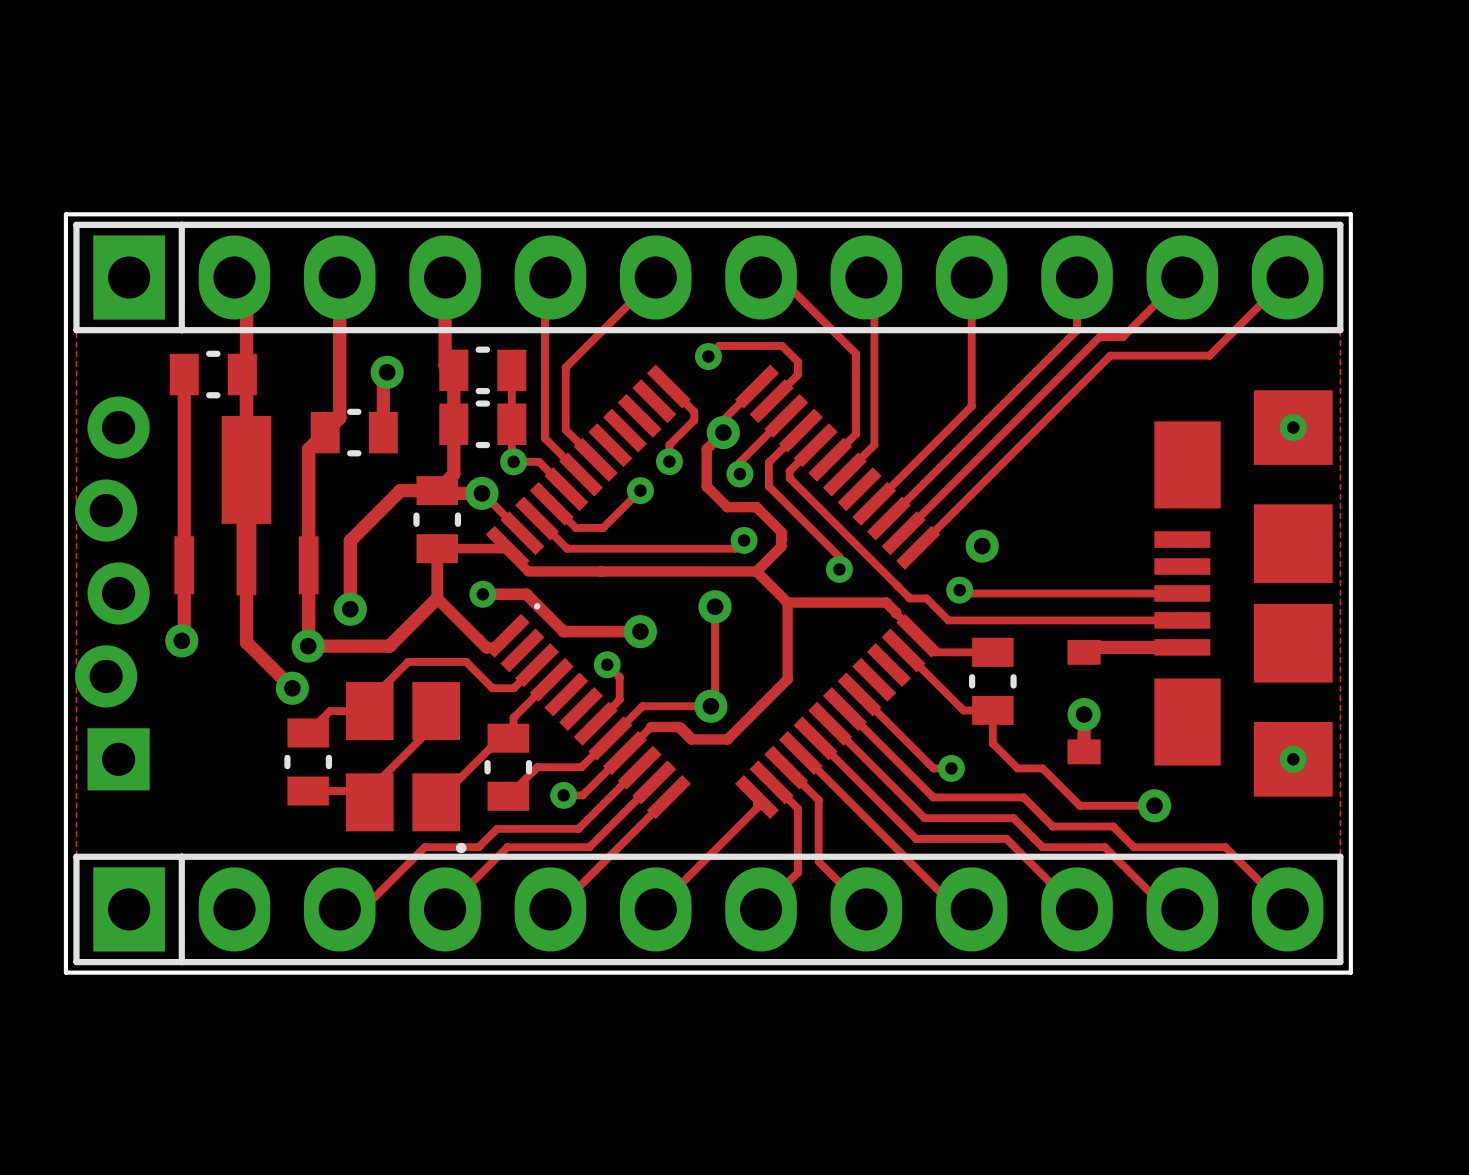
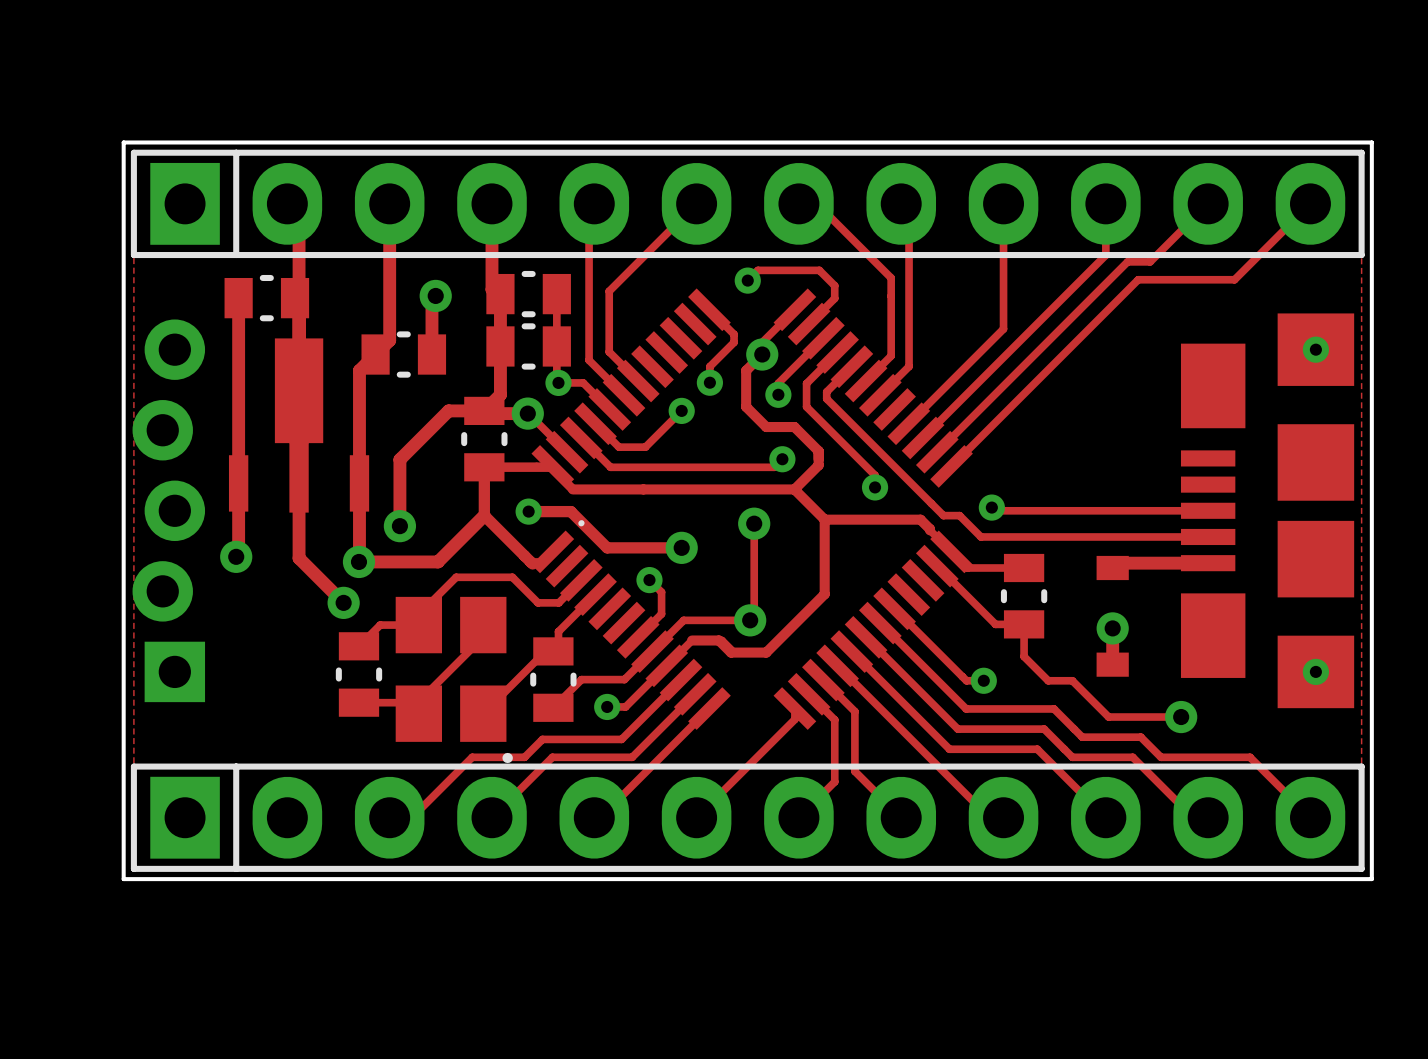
via: (982, 546) -> none

